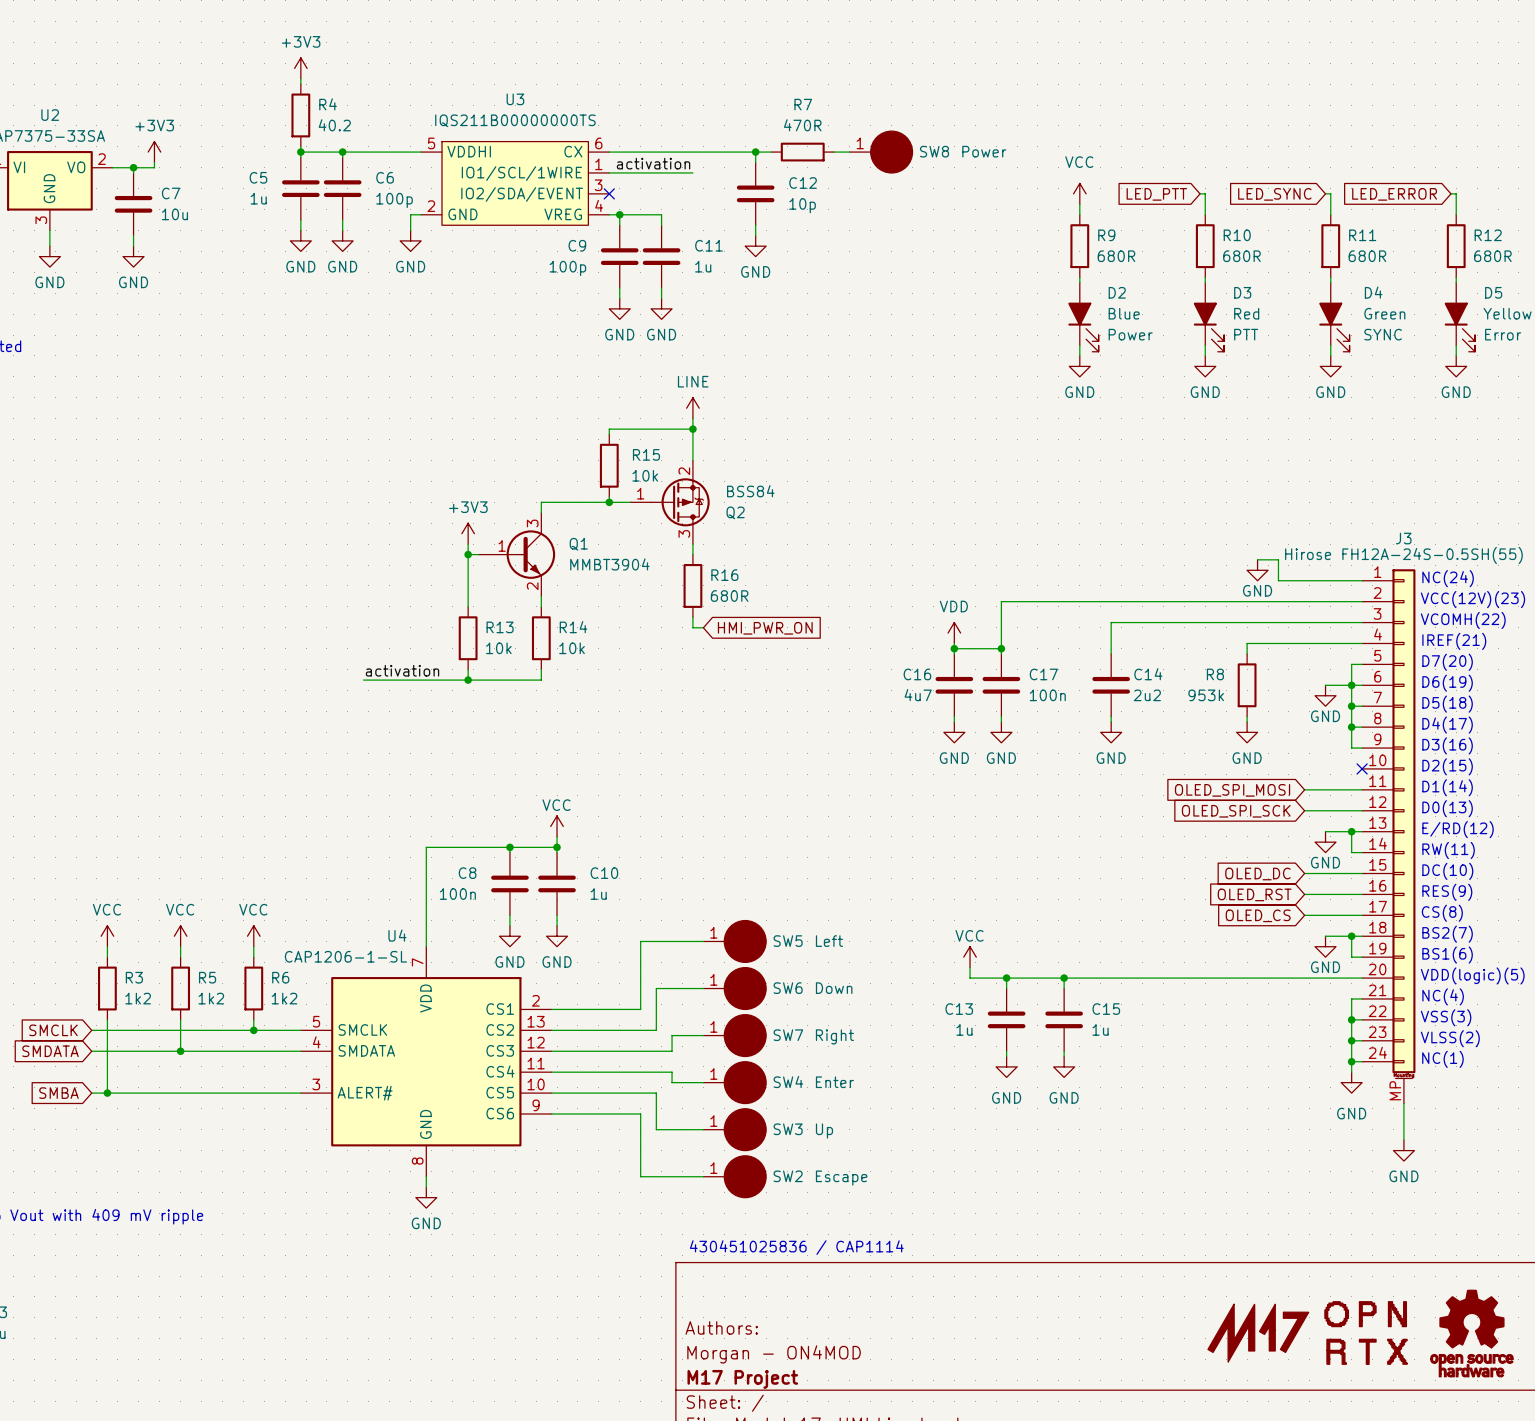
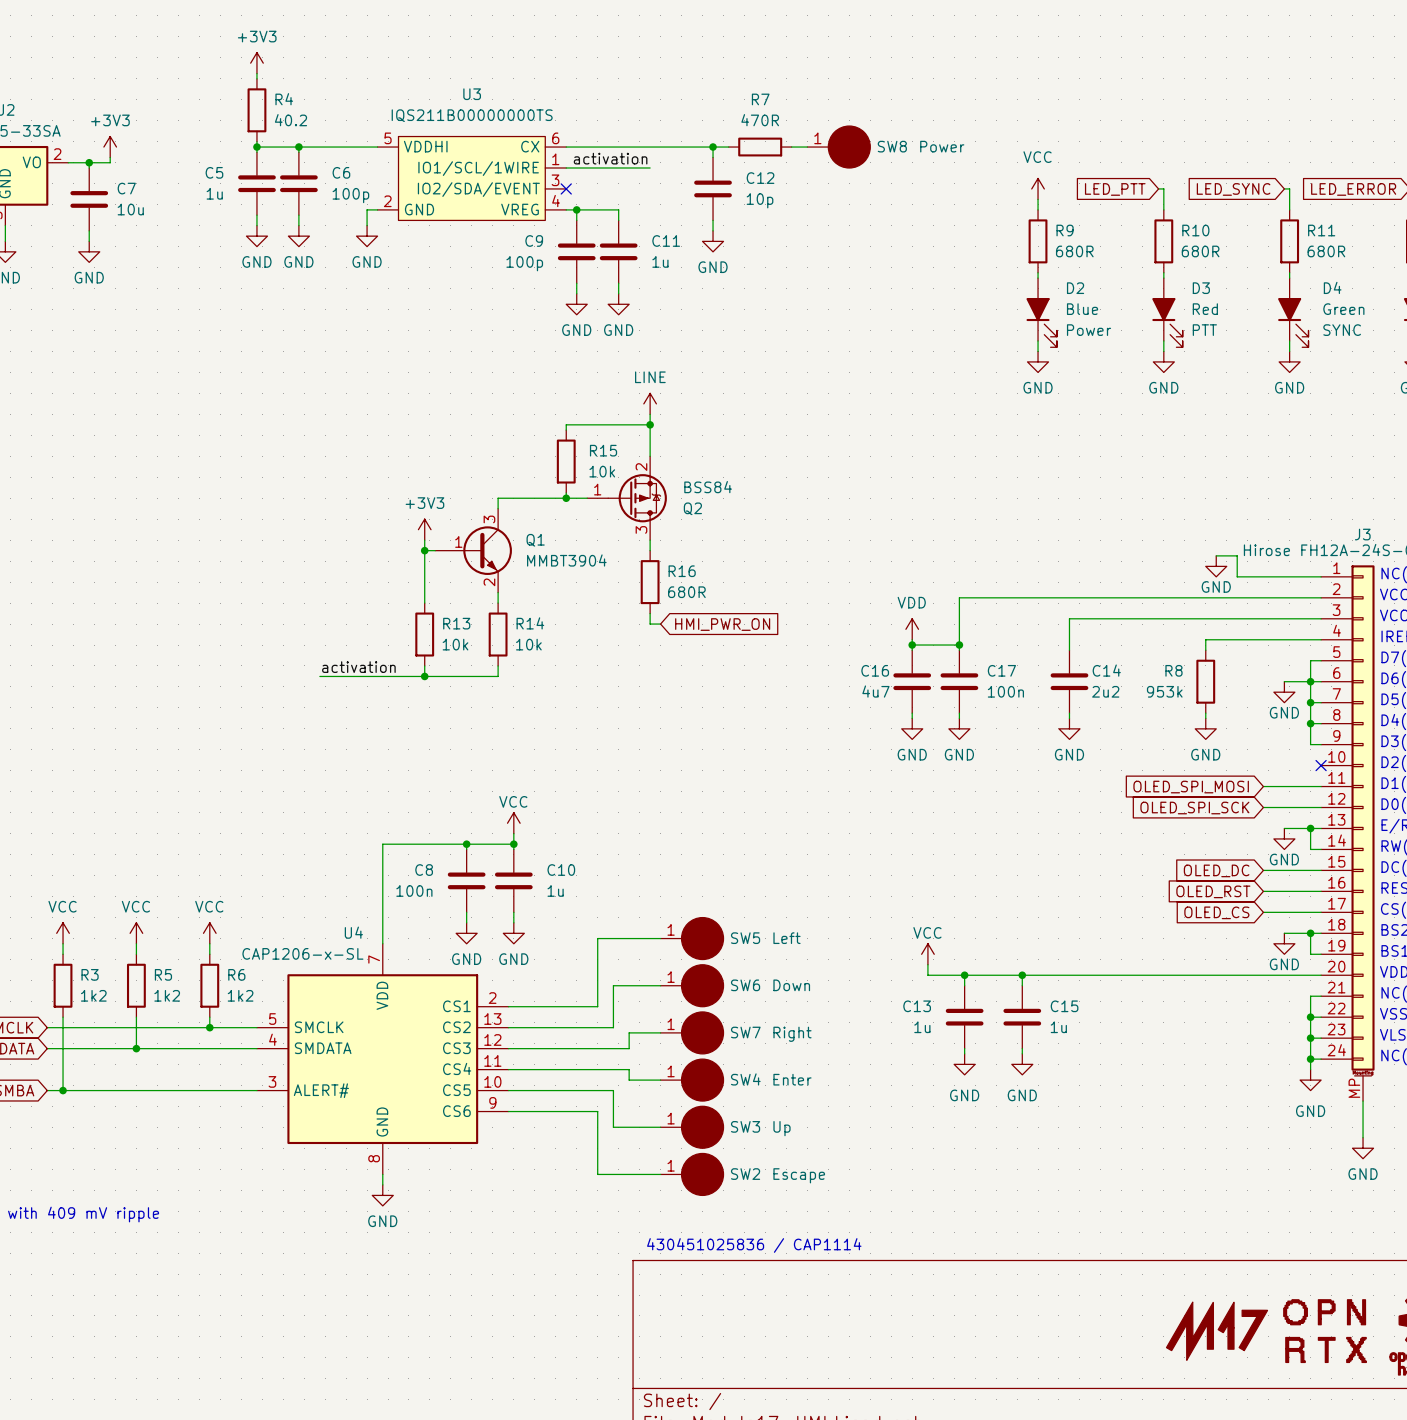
U4 value: CAP1206-1-SL (345, 956) -> CAP1206-x-SL (302, 953)
title block: Authors: (721, 1327) -> none
title block: Morgan - ON4MOD (774, 1354) -> none
title block: M17 Project (742, 1379) -> none

